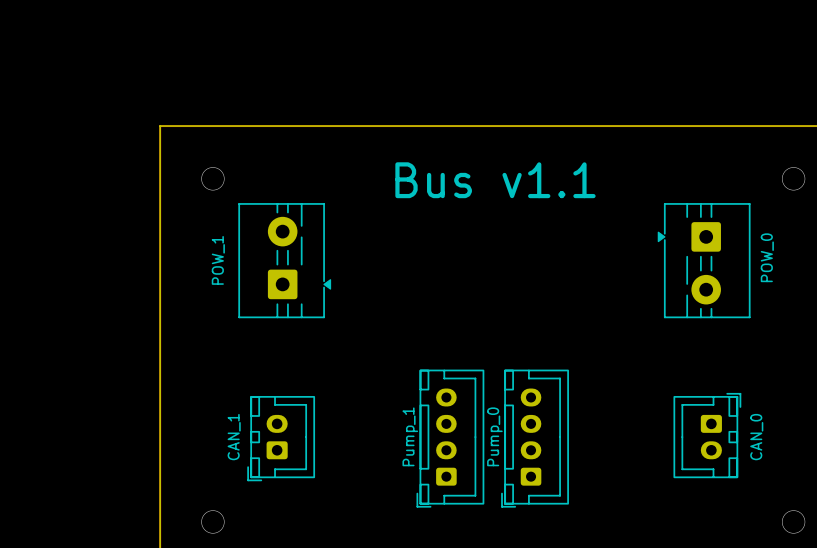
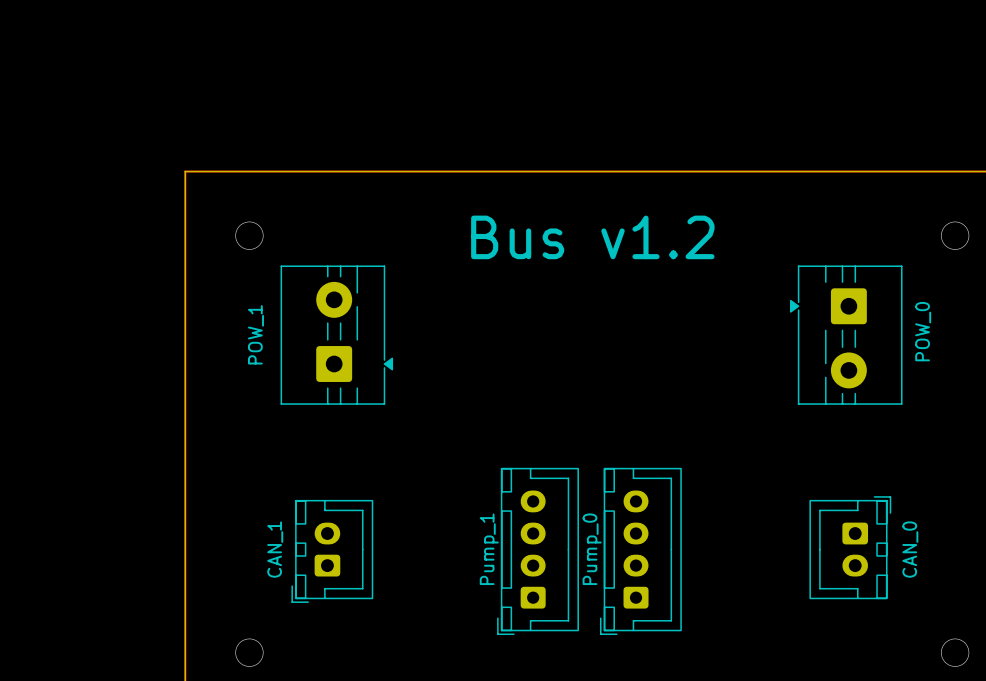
text: Bus v1.1 (495, 180) -> Bus v1.2 (592, 237)

